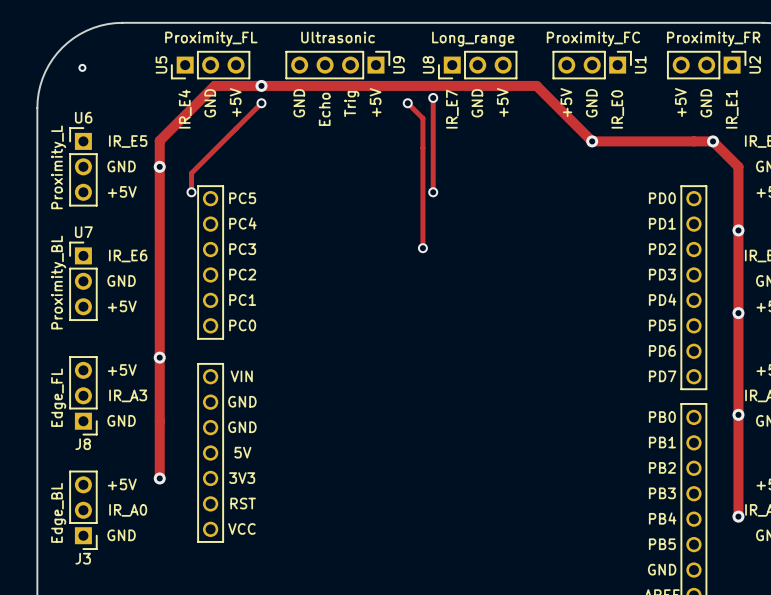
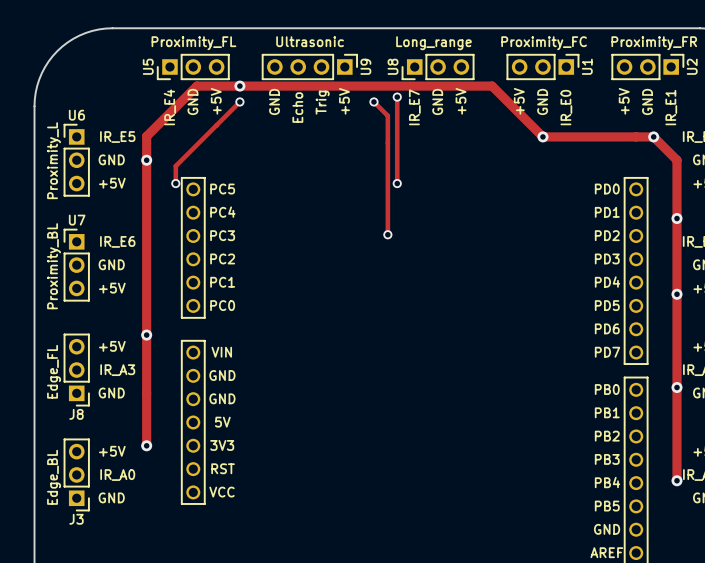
via: (82, 67) -> none

